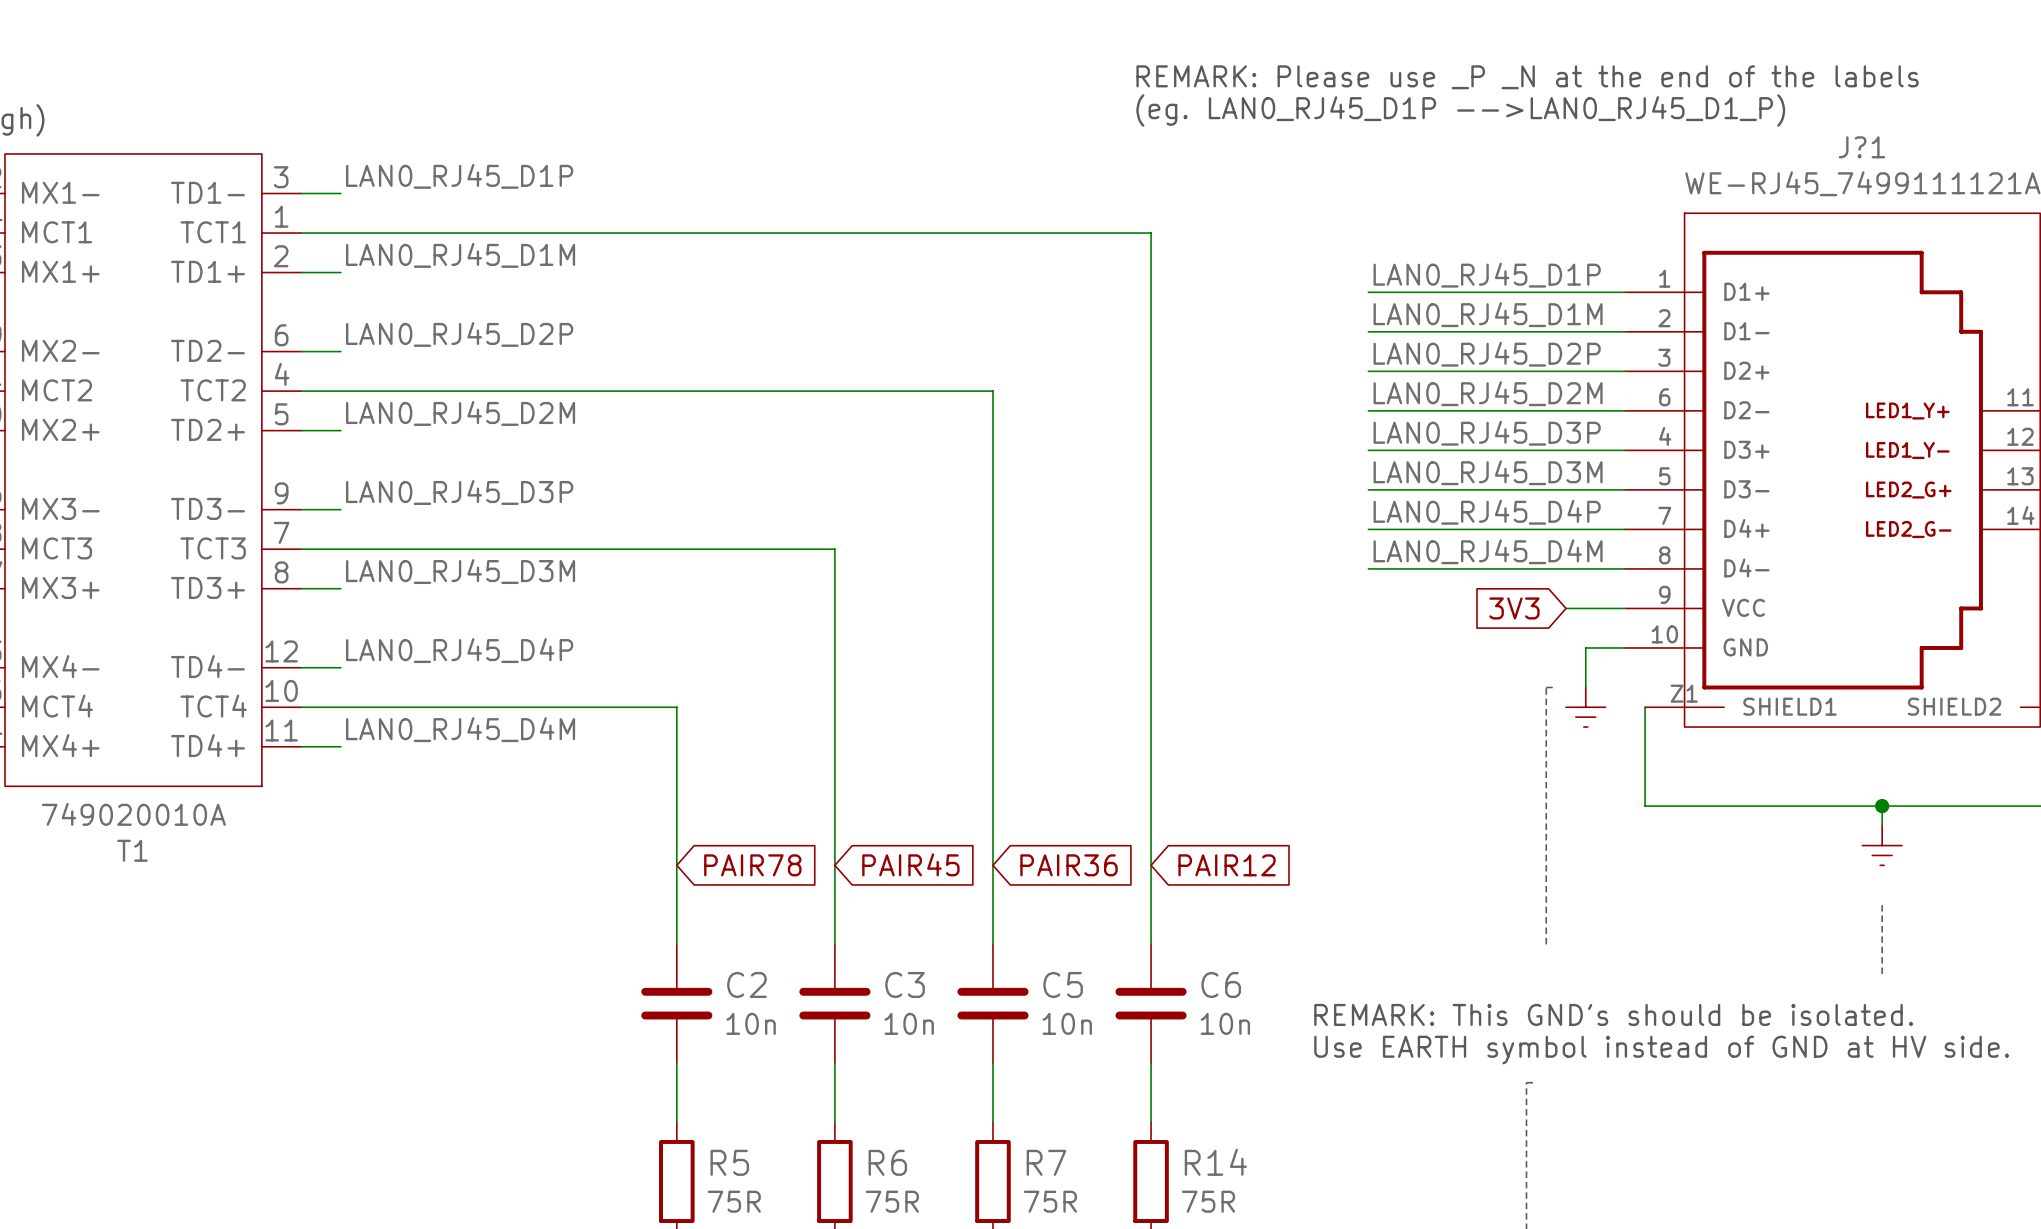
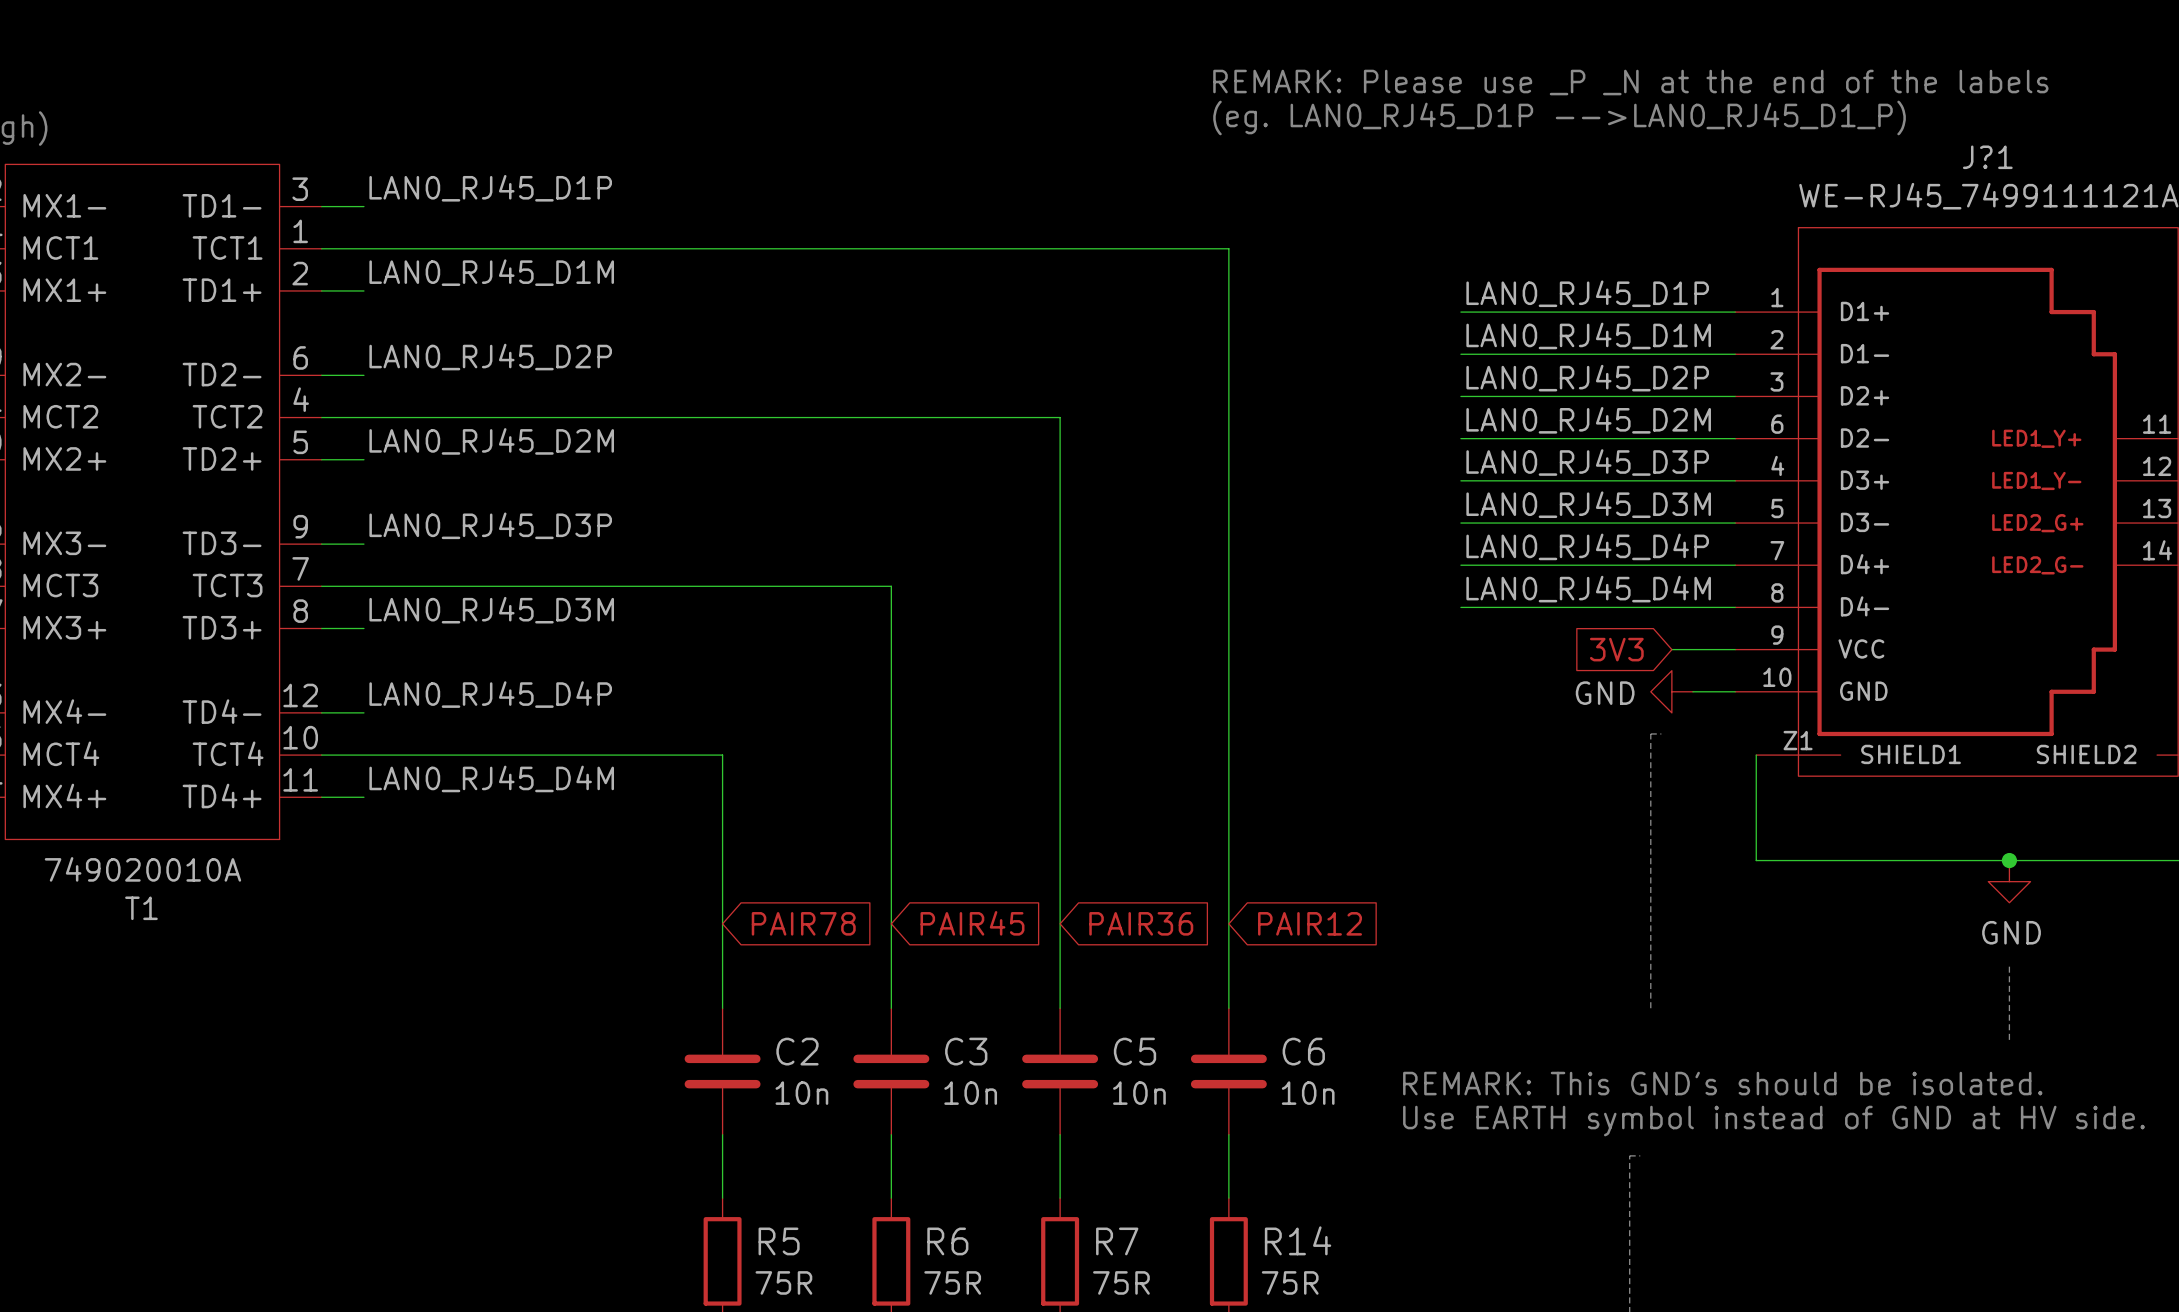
power symbol: none -> GND (1671, 691)
wire: (1585, 647) (1585, 687) -> none
power symbol: (1585, 707) -> none
power symbol: none -> GND (2009, 881)
power symbol: (1882, 845) -> none

